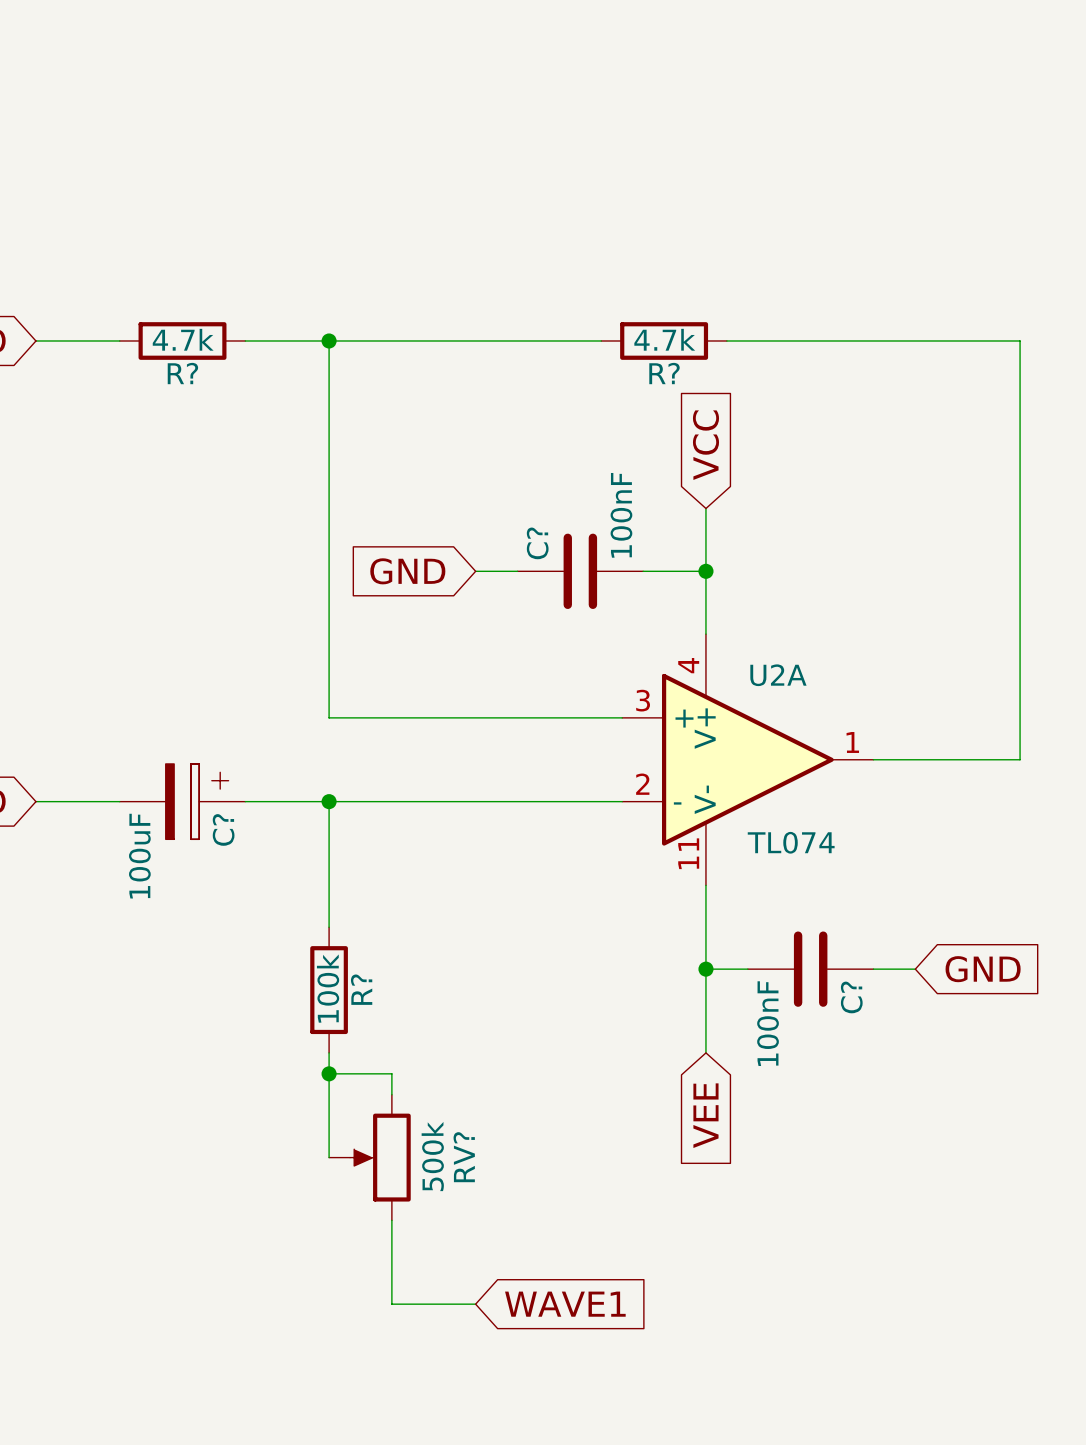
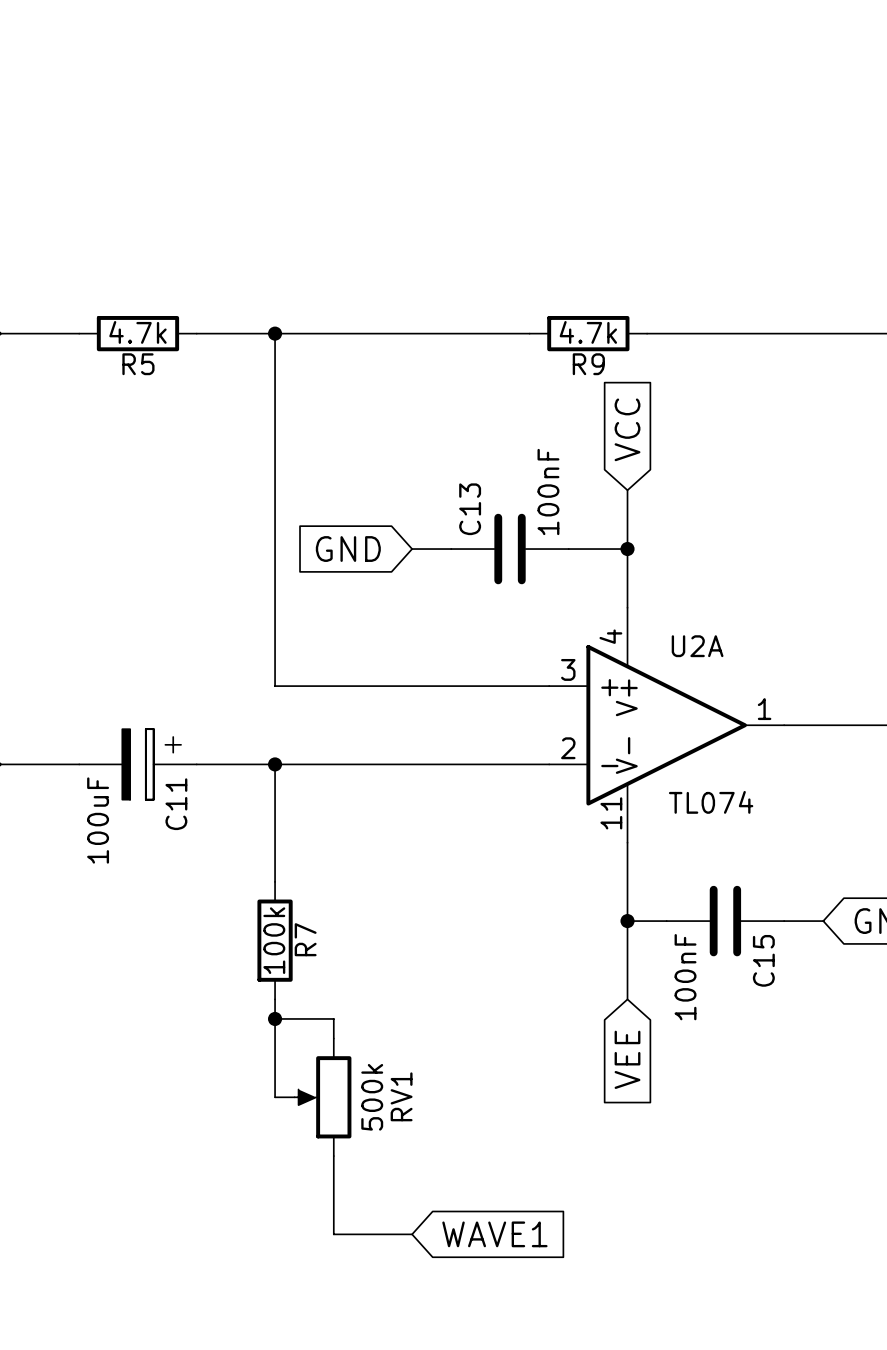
R? name: R? (182, 373) -> R5 (138, 364)
R? name: R? (664, 373) -> R9 (588, 364)
C? name: C? (537, 543) -> C13 (470, 509)
C? name: C? (223, 829) -> C11 (176, 804)
R? name: R? (361, 989) -> R7 (305, 939)
C? name: C? (851, 997) -> C15 (763, 960)
RV? name: RV? (464, 1157) -> RV1 (401, 1096)

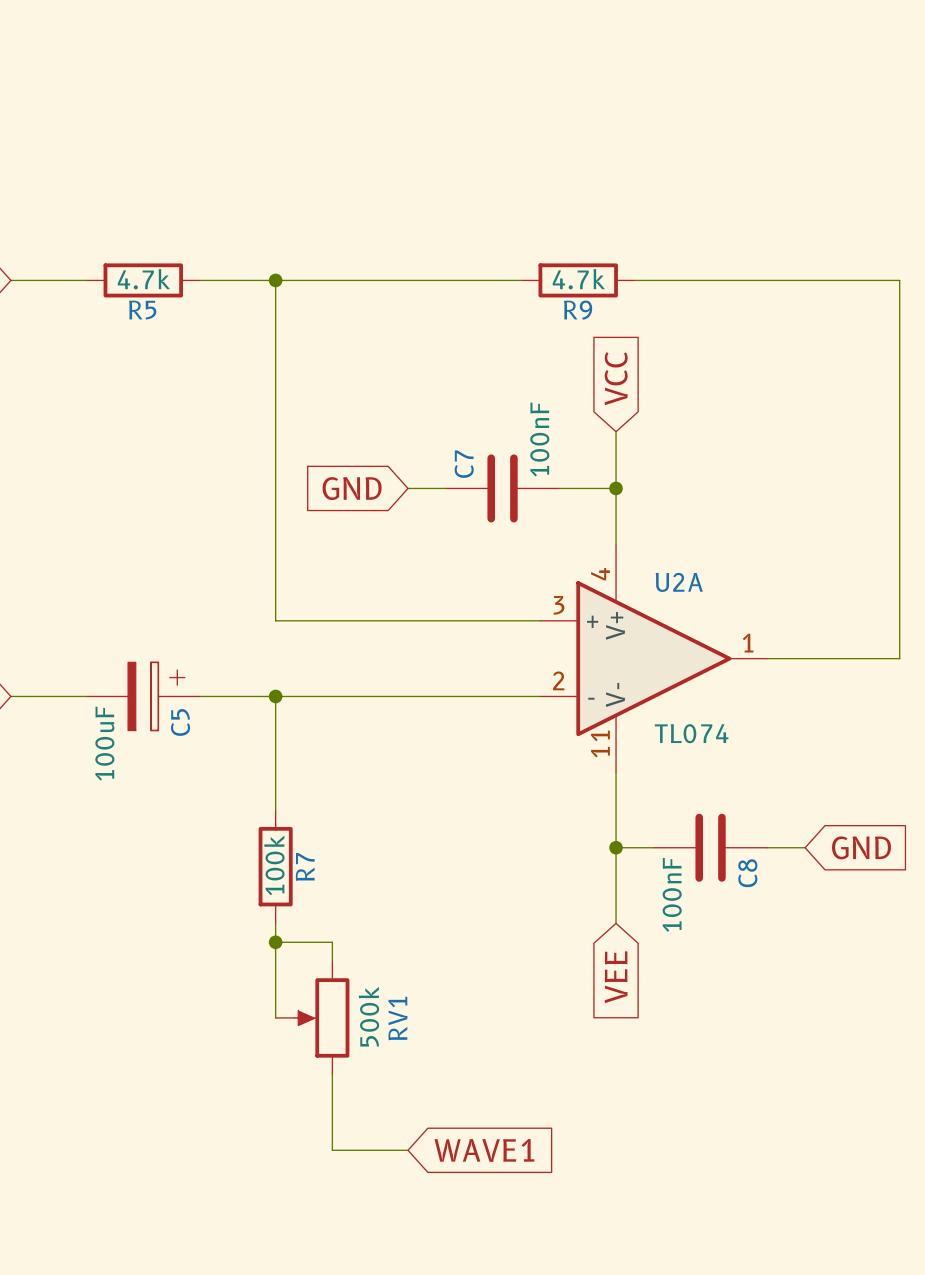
C13 name: C13 (470, 509) -> C7 (464, 464)
C11 name: C11 (176, 804) -> C5 (180, 722)
C15 name: C15 (763, 960) -> C8 (747, 873)

